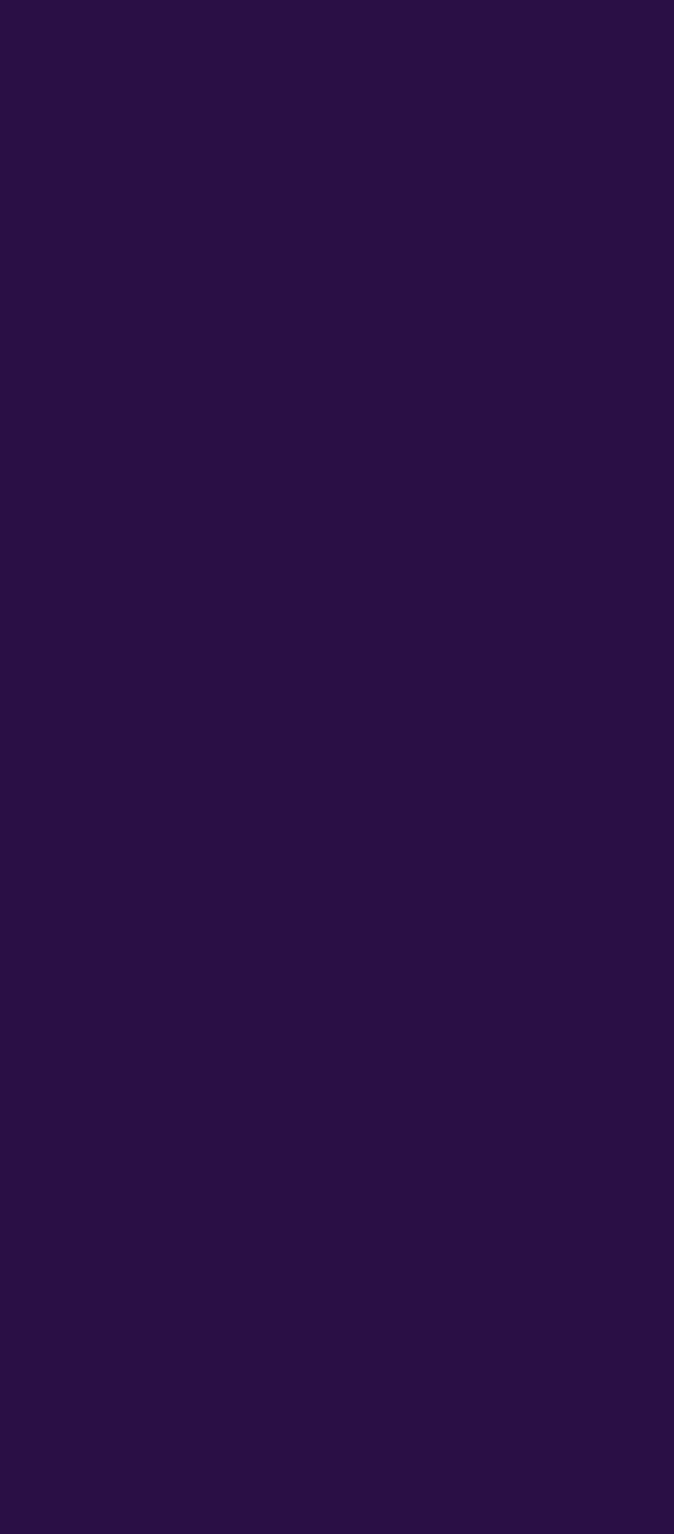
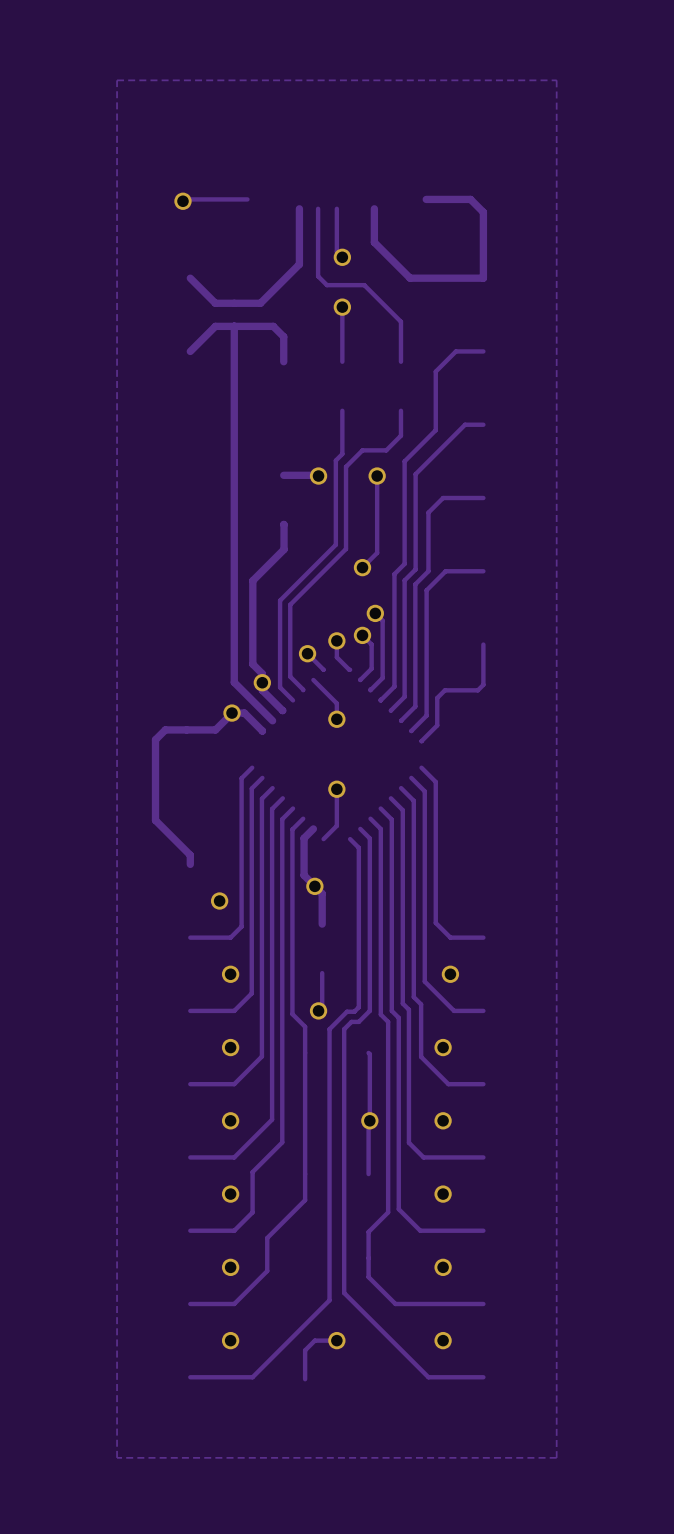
zone outline: none -> (117, 80) (117, 1457) (556, 1457) (556, 80) (117, 80)
track: none -> (247, 199) (184, 199) (182, 201)
track: none -> (426, 199) (470, 199) (483, 212) (483, 278) (410, 278) (374, 242) (374, 208)
via: none -> (182, 201)
track: none -> (299, 208) (299, 264) (260, 303) (215, 303) (190, 278)
track: none -> (318, 208) (318, 276) (326, 285) (364, 285) (400, 321) (400, 361)
track: none -> (336, 208) (336, 251) (342, 257)
via: none -> (342, 257)
track: none -> (342, 307) (342, 361)
via: none -> (342, 307)
track: none -> (234, 326) (234, 682) (272, 720)
track: none -> (190, 351) (215, 326) (273, 326) (283, 336) (283, 361)
track: none -> (483, 351) (455, 351) (435, 371) (435, 430) (404, 461) (404, 563) (394, 574) (394, 686) (380, 699)
track: none -> (342, 410) (342, 454) (335, 460) (335, 544) (280, 600) (280, 687) (293, 700)
track: none -> (400, 410) (400, 435) (386, 450) (362, 450) (346, 466) (346, 549) (290, 604) (290, 676) (303, 689)
track: none -> (483, 424) (465, 424) (415, 474) (415, 569) (404, 580) (404, 696) (390, 710)
track: none -> (283, 475) (318, 476)
via: none -> (318, 476)
track: none -> (377, 476) (377, 552) (362, 567)
via: none -> (377, 476)
track: none -> (483, 498) (443, 498) (428, 512) (428, 571) (415, 584) (415, 706) (401, 720)
track: none -> (284, 524) (284, 549) (252, 580) (252, 664) (262, 673) (262, 690) (282, 710)
via: none -> (362, 567)
track: none -> (483, 571) (445, 571) (426, 590) (426, 715) (411, 731)
track: none -> (375, 613) (382, 620) (382, 678) (370, 689)
via: none -> (375, 613)
track: none -> (362, 635) (371, 644) (371, 668) (360, 680)
via: none -> (362, 635)
track: none -> (336, 640) (336, 657) (350, 669)
via: none -> (336, 640)
track: none -> (483, 644) (483, 684) (477, 690) (444, 690) (437, 698) (437, 725) (421, 741)
track: none -> (307, 653) (323, 669)
via: none -> (307, 653)
track: none -> (313, 680) (336, 703) (336, 719)
via: none -> (262, 682)
track: none -> (232, 713) (244, 713) (262, 731)
track: none -> (232, 713) (215, 729) (165, 729) (155, 739) (155, 820) (190, 855) (190, 864)
via: none -> (232, 713)
via: none -> (336, 719)
track: none -> (252, 767) (241, 778) (241, 926) (230, 937) (190, 937)
track: none -> (421, 767) (435, 781) (435, 922) (450, 937) (483, 937)
track: none -> (262, 777) (251, 788) (251, 993) (234, 1010) (190, 1010)
track: none -> (411, 777) (424, 791) (424, 981) (454, 1010) (483, 1010)
track: none -> (272, 788) (261, 798) (261, 1056) (234, 1084) (190, 1084)
track: none -> (401, 788) (413, 800) (413, 997) (421, 1004) (421, 1056) (448, 1084) (483, 1084)
track: none -> (336, 789) (336, 825) (323, 839)
via: none -> (336, 789)
track: none -> (282, 798) (272, 809) (272, 1119) (234, 1157) (190, 1157)
track: none -> (390, 798) (402, 810) (402, 1003) (408, 1009) (408, 1142) (423, 1157) (483, 1157)
track: none -> (293, 808) (282, 819) (282, 1142) (252, 1172) (252, 1212) (234, 1230) (190, 1230)
track: none -> (380, 808) (391, 819) (391, 1010) (398, 1017) (398, 1209) (420, 1230) (483, 1230)
track: none -> (303, 818) (292, 829) (292, 1014) (305, 1026) (305, 1200) (267, 1238) (267, 1271) (234, 1303) (190, 1303)
track: none -> (370, 818) (380, 829) (380, 1014) (388, 1021) (388, 1212) (368, 1231) (368, 1277) (395, 1303) (483, 1303)
track: none -> (313, 828) (304, 838) (304, 875) (322, 893) (322, 924)
track: none -> (360, 828) (369, 838) (369, 1010) (358, 1021) (351, 1021) (344, 1029) (344, 1293) (428, 1377) (483, 1377)
track: none -> (350, 839) (358, 847) (358, 1007) (354, 1011) (347, 1011) (329, 1029) (329, 1300) (252, 1377) (190, 1377)
via: none -> (314, 886)
via: none -> (219, 901)
track: none -> (322, 973) (322, 1007) (318, 1010)
via: none -> (230, 974)
via: none -> (450, 974)
via: none -> (318, 1010)
via: none -> (230, 1047)
via: none -> (443, 1047)
track: none -> (368, 1052) (368, 1174)
via: none -> (230, 1120)
via: none -> (369, 1120)
via: none -> (443, 1120)
via: none -> (230, 1194)
via: none -> (443, 1194)
via: none -> (230, 1267)
via: none -> (443, 1267)
via: none -> (230, 1340)
track: none -> (336, 1340) (314, 1340) (305, 1350) (305, 1379)
via: none -> (336, 1340)
via: none -> (443, 1340)

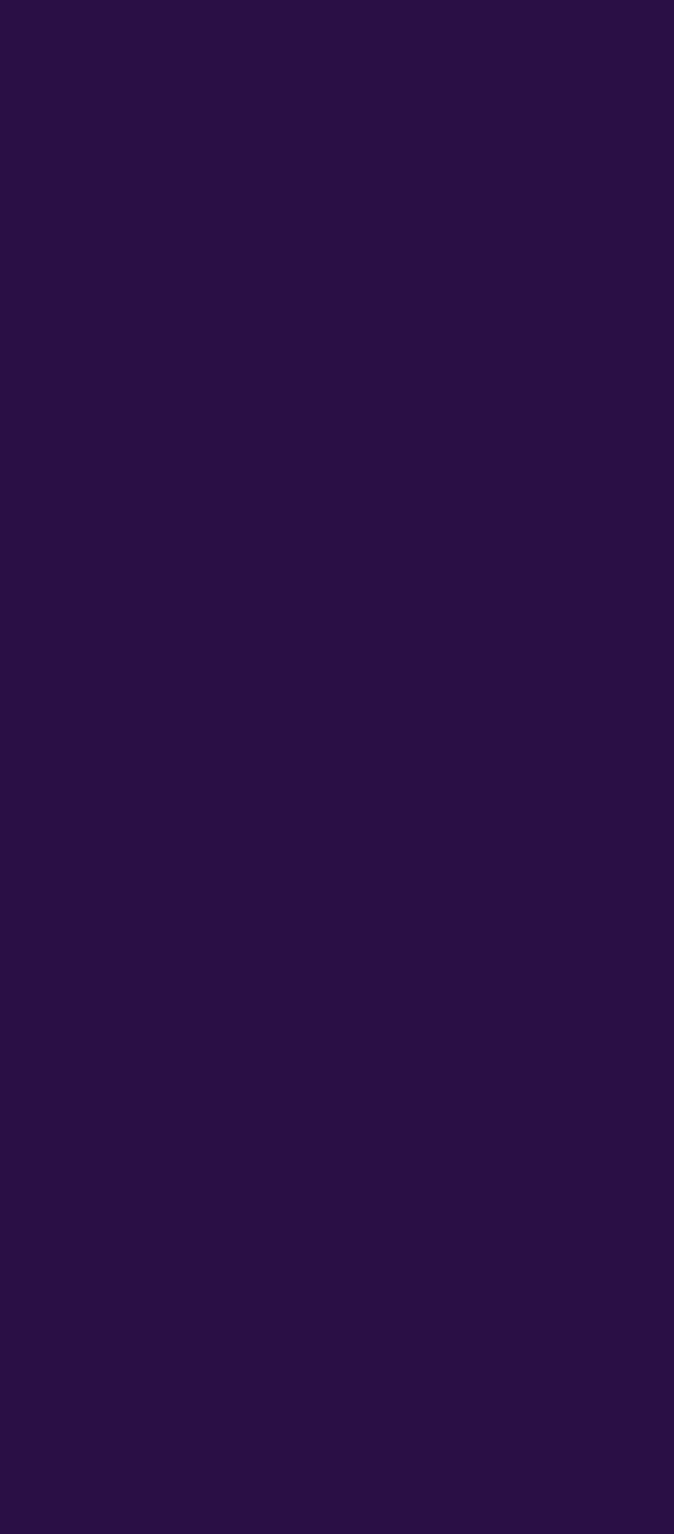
zone outline: (117, 80) (117, 1457) (556, 1457) (556, 80) (117, 80) -> none
track: (247, 199) (184, 199) (182, 201) -> none
track: (426, 199) (470, 199) (483, 212) (483, 278) (410, 278) (374, 242) (374, 208) -> none
via: (182, 201) -> none
track: (299, 208) (299, 264) (260, 303) (215, 303) (190, 278) -> none
track: (318, 208) (318, 276) (326, 285) (364, 285) (400, 321) (400, 361) -> none
track: (336, 208) (336, 251) (342, 257) -> none
via: (342, 257) -> none
track: (342, 307) (342, 361) -> none
via: (342, 307) -> none
track: (234, 326) (234, 682) (272, 720) -> none
track: (190, 351) (215, 326) (273, 326) (283, 336) (283, 361) -> none
track: (483, 351) (455, 351) (435, 371) (435, 430) (404, 461) (404, 563) (394, 574) (394, 686) (380, 699) -> none
track: (342, 410) (342, 454) (335, 460) (335, 544) (280, 600) (280, 687) (293, 700) -> none
track: (400, 410) (400, 435) (386, 450) (362, 450) (346, 466) (346, 549) (290, 604) (290, 676) (303, 689) -> none
track: (483, 424) (465, 424) (415, 474) (415, 569) (404, 580) (404, 696) (390, 710) -> none
track: (283, 475) (318, 476) -> none
via: (318, 476) -> none
track: (377, 476) (377, 552) (362, 567) -> none
via: (377, 476) -> none
track: (483, 498) (443, 498) (428, 512) (428, 571) (415, 584) (415, 706) (401, 720) -> none
track: (284, 524) (284, 549) (252, 580) (252, 664) (262, 673) (262, 690) (282, 710) -> none
via: (362, 567) -> none
track: (483, 571) (445, 571) (426, 590) (426, 715) (411, 731) -> none
track: (375, 613) (382, 620) (382, 678) (370, 689) -> none
via: (375, 613) -> none
track: (362, 635) (371, 644) (371, 668) (360, 680) -> none
via: (362, 635) -> none
track: (336, 640) (336, 657) (350, 669) -> none
via: (336, 640) -> none
track: (483, 644) (483, 684) (477, 690) (444, 690) (437, 698) (437, 725) (421, 741) -> none
track: (307, 653) (323, 669) -> none
via: (307, 653) -> none
track: (313, 680) (336, 703) (336, 719) -> none
via: (262, 682) -> none
track: (232, 713) (244, 713) (262, 731) -> none
track: (232, 713) (215, 729) (165, 729) (155, 739) (155, 820) (190, 855) (190, 864) -> none
via: (232, 713) -> none
via: (336, 719) -> none
track: (252, 767) (241, 778) (241, 926) (230, 937) (190, 937) -> none
track: (421, 767) (435, 781) (435, 922) (450, 937) (483, 937) -> none
track: (262, 777) (251, 788) (251, 993) (234, 1010) (190, 1010) -> none
track: (411, 777) (424, 791) (424, 981) (454, 1010) (483, 1010) -> none
track: (272, 788) (261, 798) (261, 1056) (234, 1084) (190, 1084) -> none
track: (401, 788) (413, 800) (413, 997) (421, 1004) (421, 1056) (448, 1084) (483, 1084) -> none
track: (336, 789) (336, 825) (323, 839) -> none
via: (336, 789) -> none
track: (282, 798) (272, 809) (272, 1119) (234, 1157) (190, 1157) -> none
track: (390, 798) (402, 810) (402, 1003) (408, 1009) (408, 1142) (423, 1157) (483, 1157) -> none
track: (293, 808) (282, 819) (282, 1142) (252, 1172) (252, 1212) (234, 1230) (190, 1230) -> none
track: (380, 808) (391, 819) (391, 1010) (398, 1017) (398, 1209) (420, 1230) (483, 1230) -> none
track: (303, 818) (292, 829) (292, 1014) (305, 1026) (305, 1200) (267, 1238) (267, 1271) (234, 1303) (190, 1303) -> none
track: (370, 818) (380, 829) (380, 1014) (388, 1021) (388, 1212) (368, 1231) (368, 1277) (395, 1303) (483, 1303) -> none
track: (313, 828) (304, 838) (304, 875) (322, 893) (322, 924) -> none
track: (360, 828) (369, 838) (369, 1010) (358, 1021) (351, 1021) (344, 1029) (344, 1293) (428, 1377) (483, 1377) -> none
track: (350, 839) (358, 847) (358, 1007) (354, 1011) (347, 1011) (329, 1029) (329, 1300) (252, 1377) (190, 1377) -> none
via: (314, 886) -> none
via: (219, 901) -> none
track: (322, 973) (322, 1007) (318, 1010) -> none
via: (230, 974) -> none
via: (450, 974) -> none
via: (318, 1010) -> none
via: (230, 1047) -> none
via: (443, 1047) -> none
track: (368, 1052) (368, 1174) -> none
via: (230, 1120) -> none
via: (369, 1120) -> none
via: (443, 1120) -> none
via: (230, 1194) -> none
via: (443, 1194) -> none
via: (230, 1267) -> none
via: (443, 1267) -> none
via: (230, 1340) -> none
track: (336, 1340) (314, 1340) (305, 1350) (305, 1379) -> none
via: (336, 1340) -> none
via: (443, 1340) -> none

